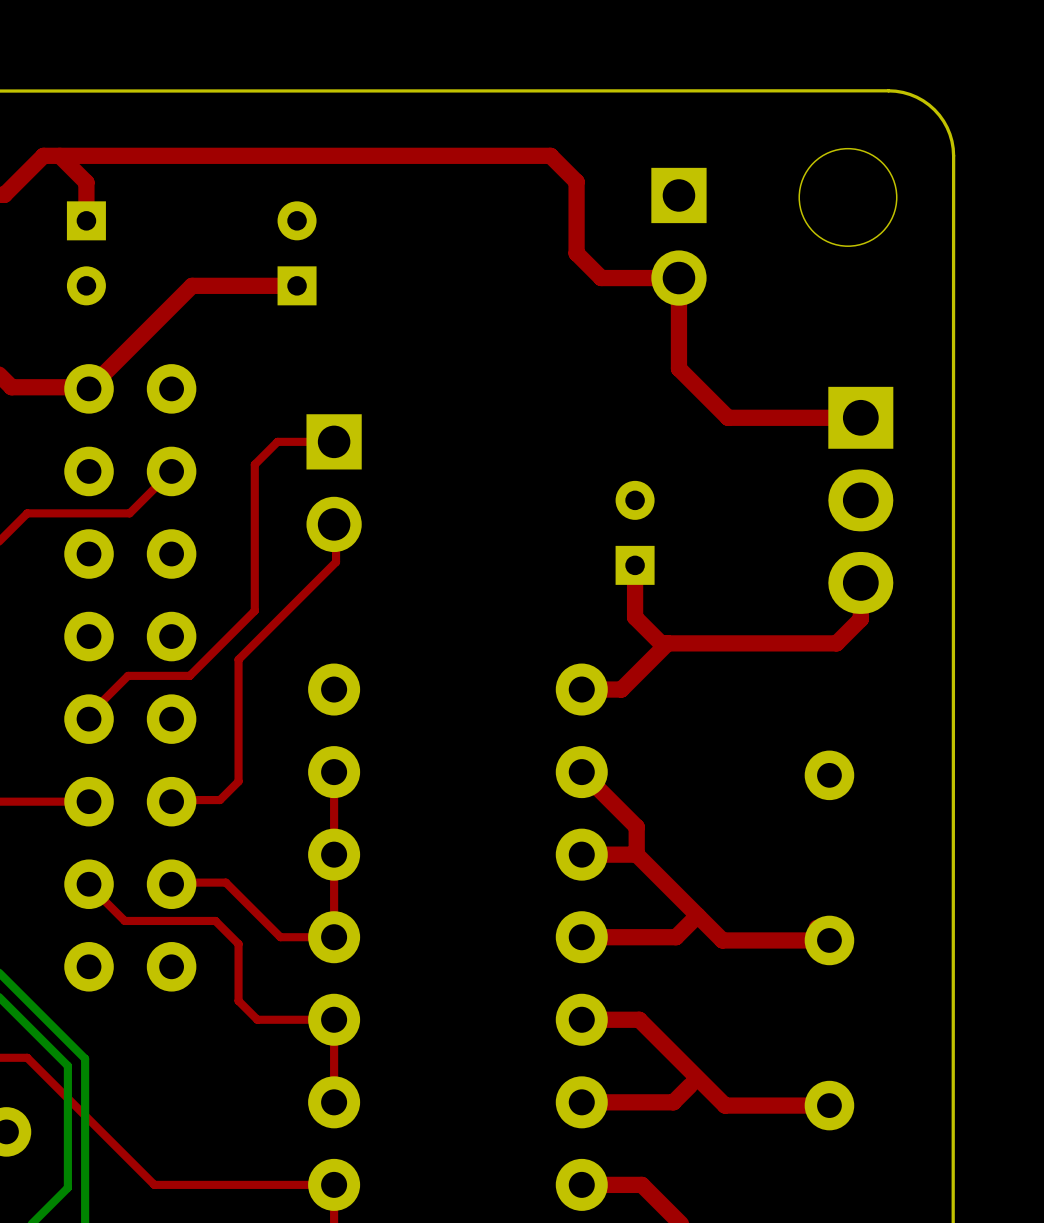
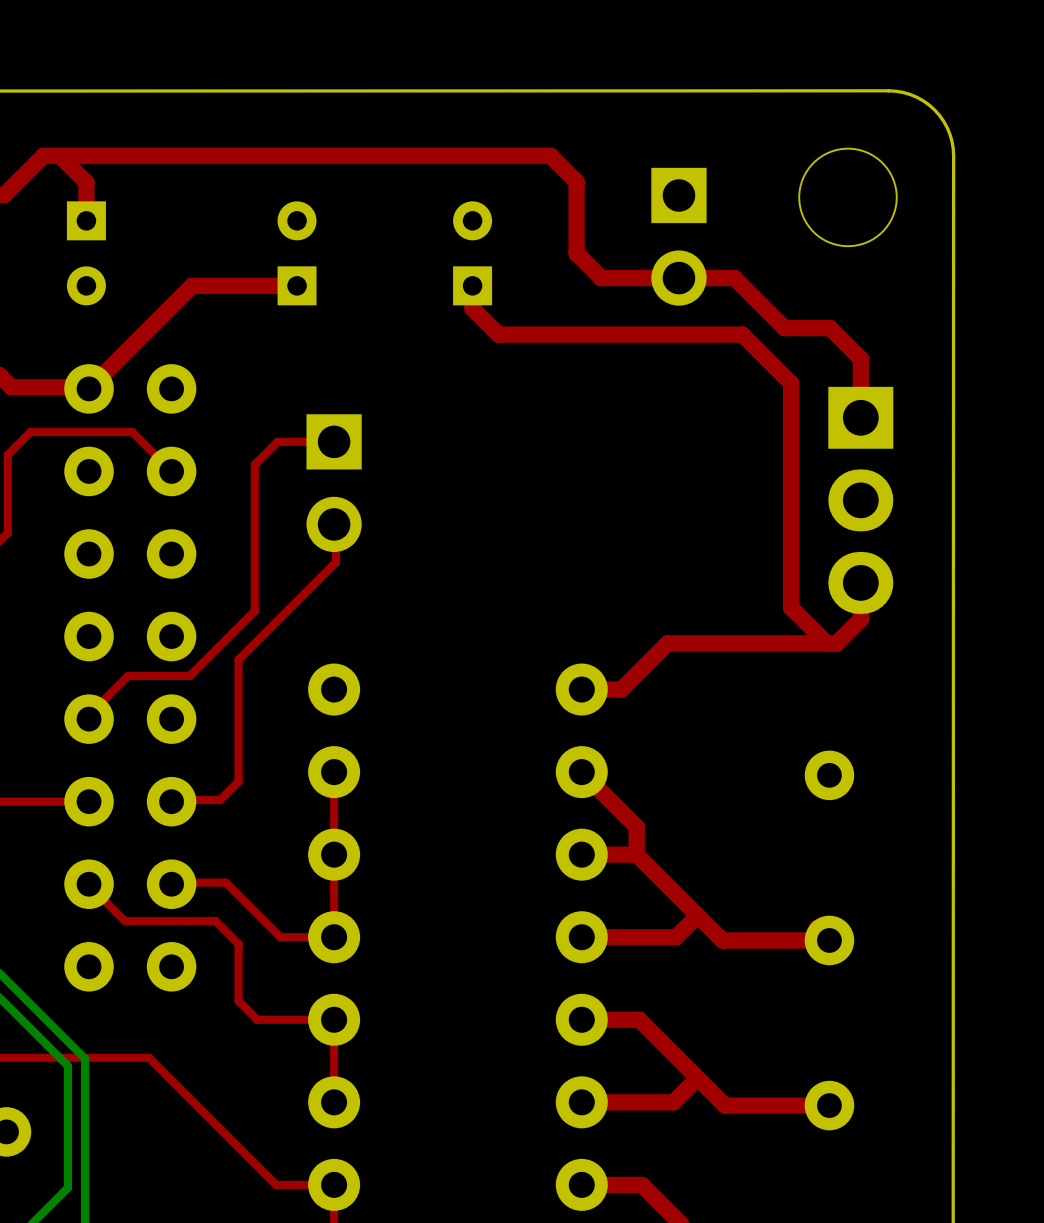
top track: (678, 278) (678, 368) (728, 417) (860, 417) -> (678, 278) (734, 278) (784, 328) (830, 328) (860, 358) (860, 417)
top track: none -> (472, 285) (472, 308) (498, 334) (742, 334) (791, 383) (791, 607) (826, 643)
top track: (171, 471) (129, 513) (27, 513) (7, 532) -> (171, 471) (132, 432) (30, 432) (7, 454) (7, 532)
part position: (635, 532) -> (472, 253)
top track: (635, 565) (635, 617) (661, 643) (667, 643) -> none
top track: (27, 1057) (154, 1184) (276, 1184) -> (27, 1057) (149, 1057) (276, 1184)

